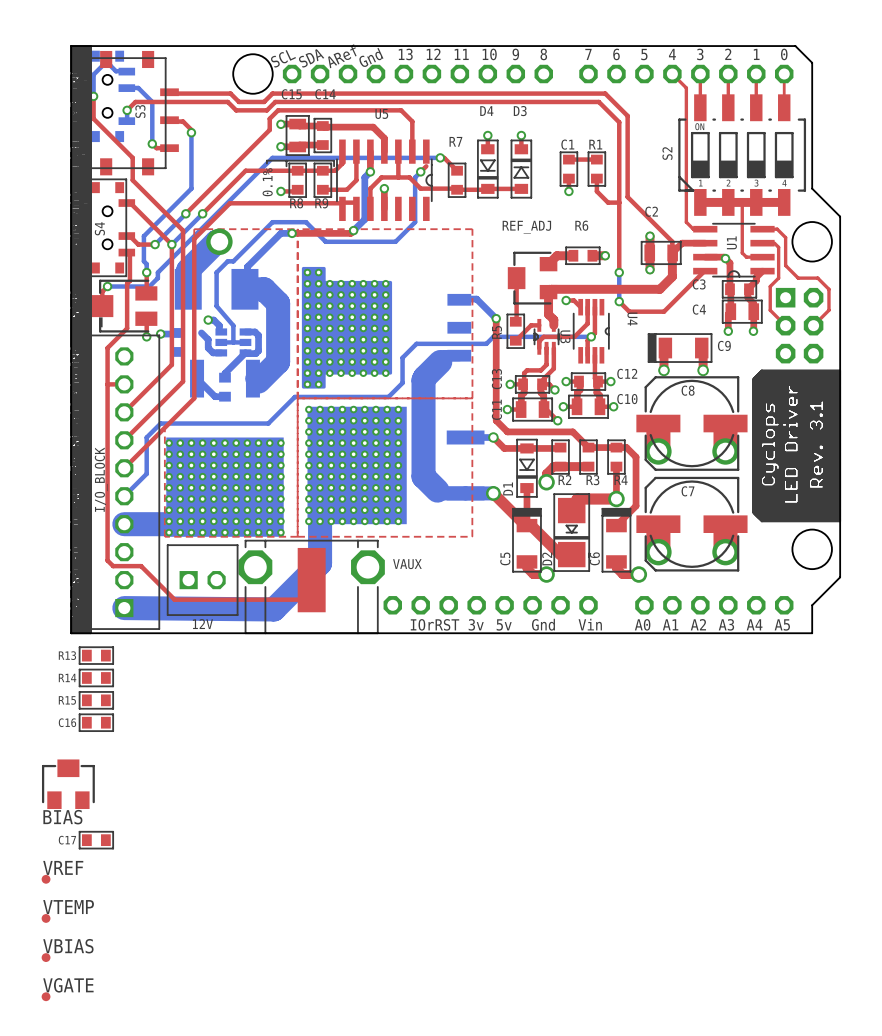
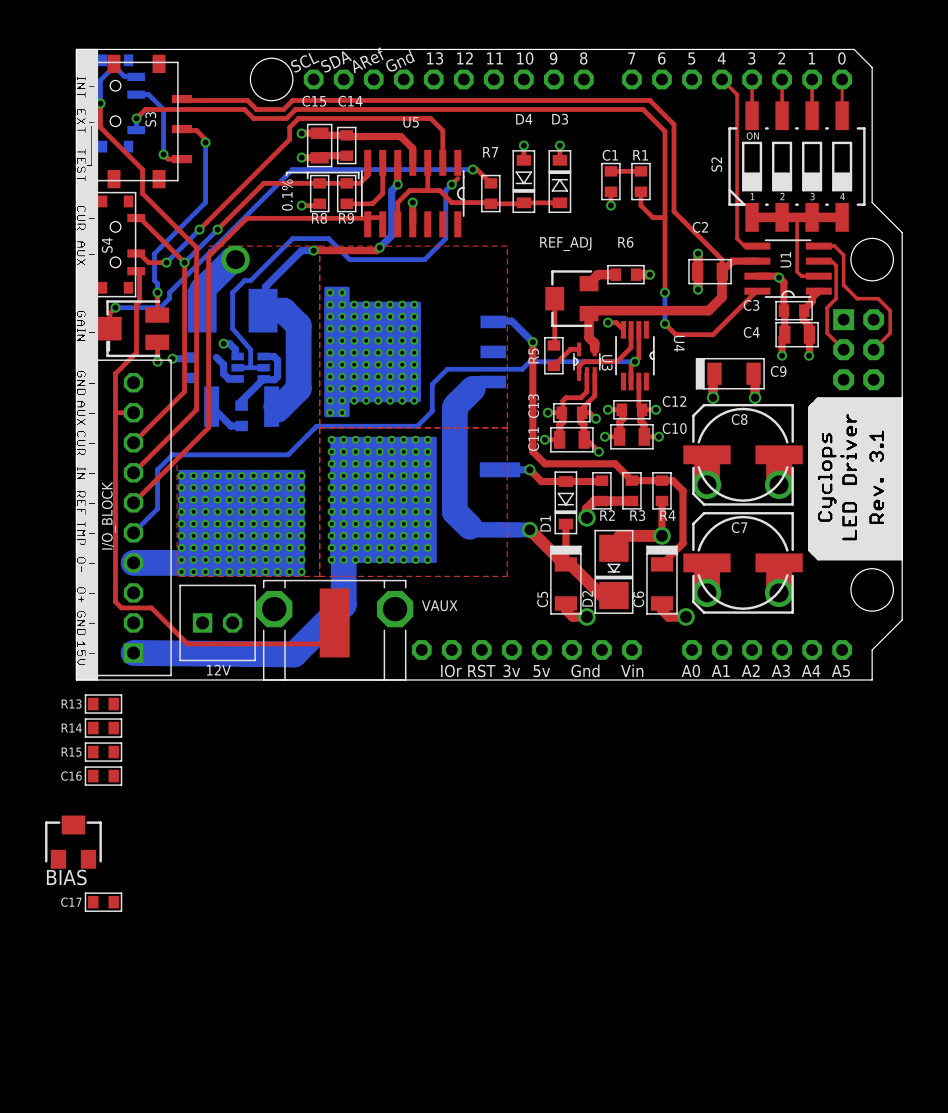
VREF: (46, 879) -> none
VTEMP: (46, 918) -> none
VBIAS: (46, 957) -> none
VGATE: (46, 996) -> none

